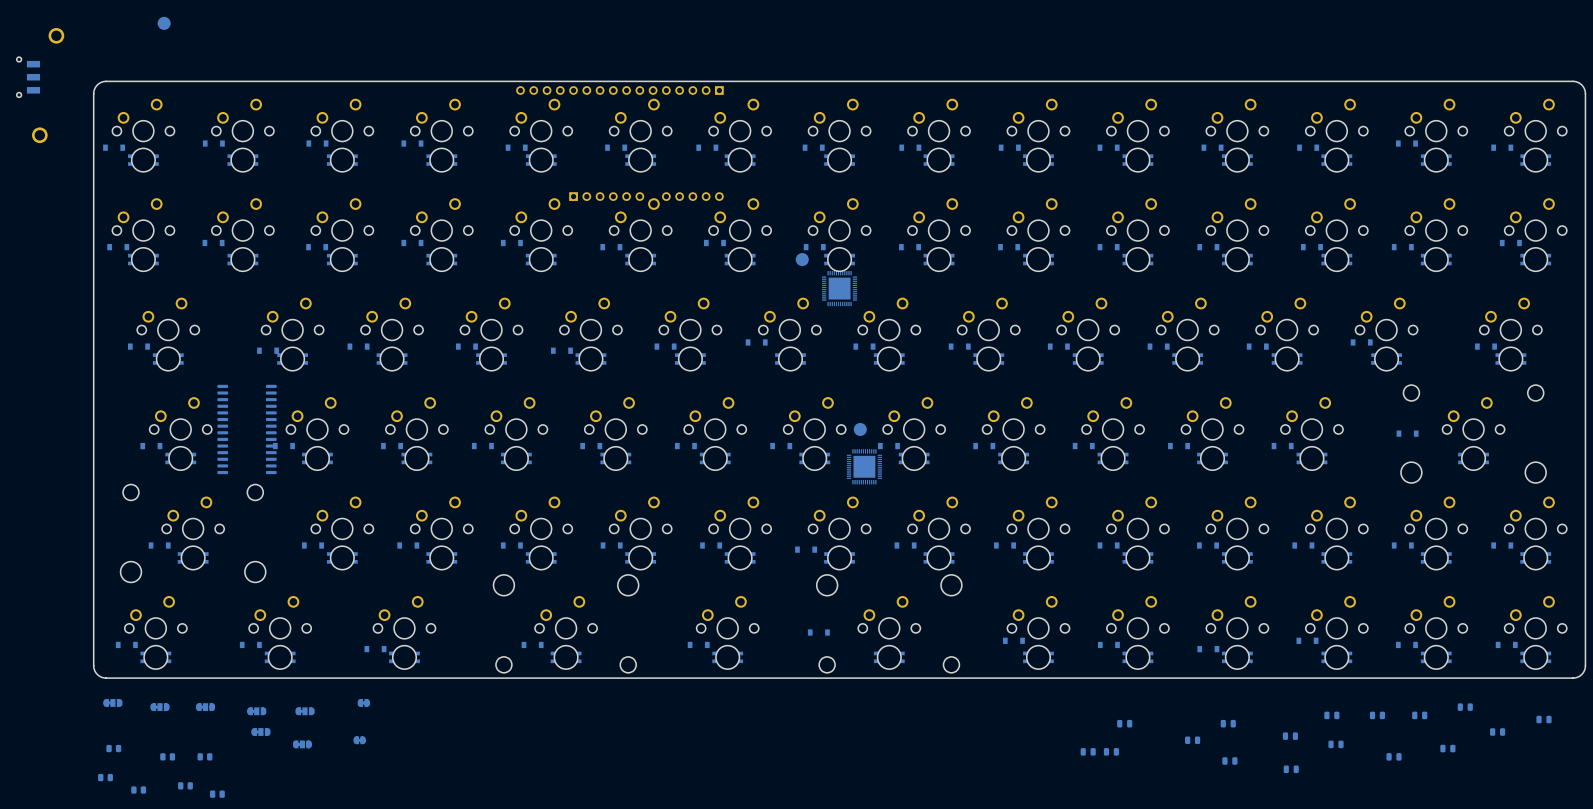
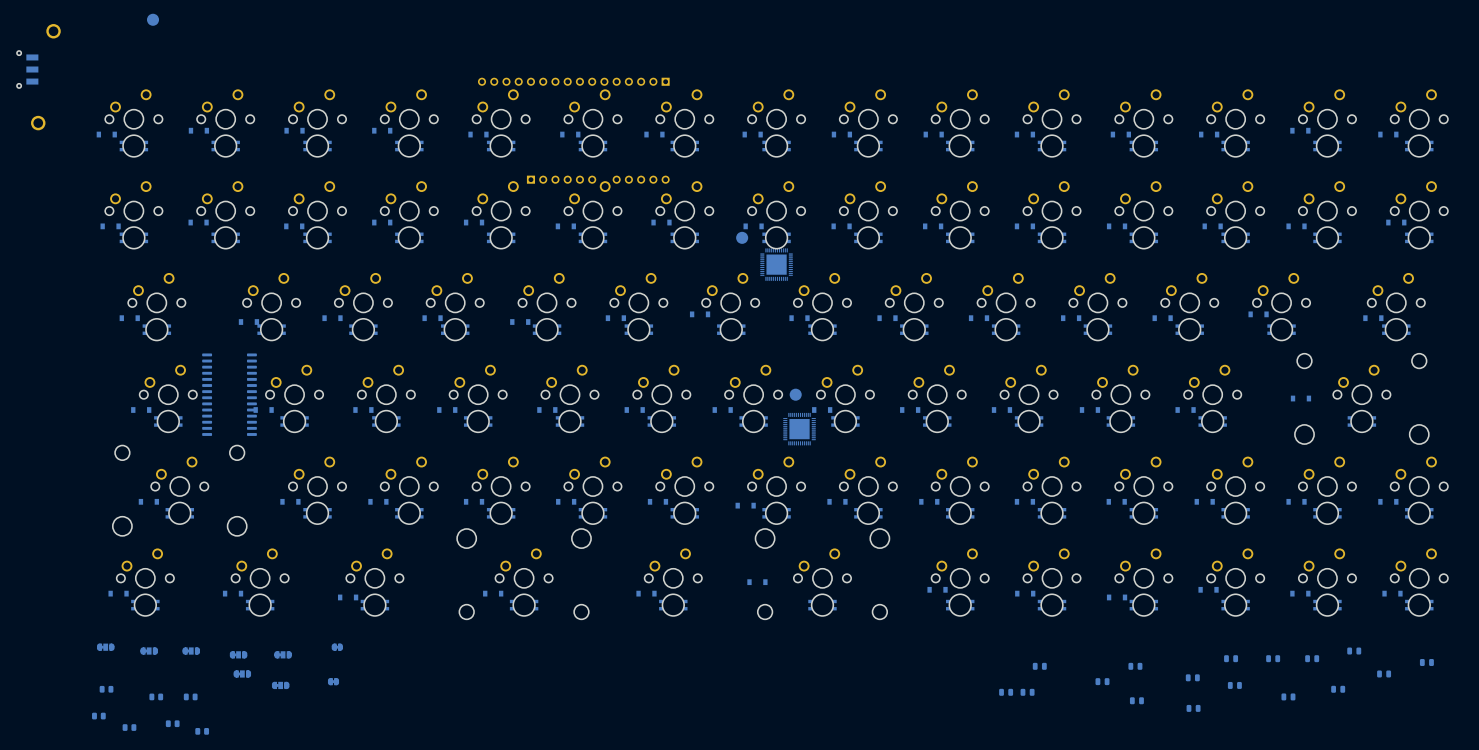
board edge: (106, 81) (1577, 82) (1582, 86) (1585, 93) (1584, 670) (1580, 675) (1573, 678) (101, 677) (95, 671) (93, 665) (93, 93) (97, 85) (106, 81) -> none

